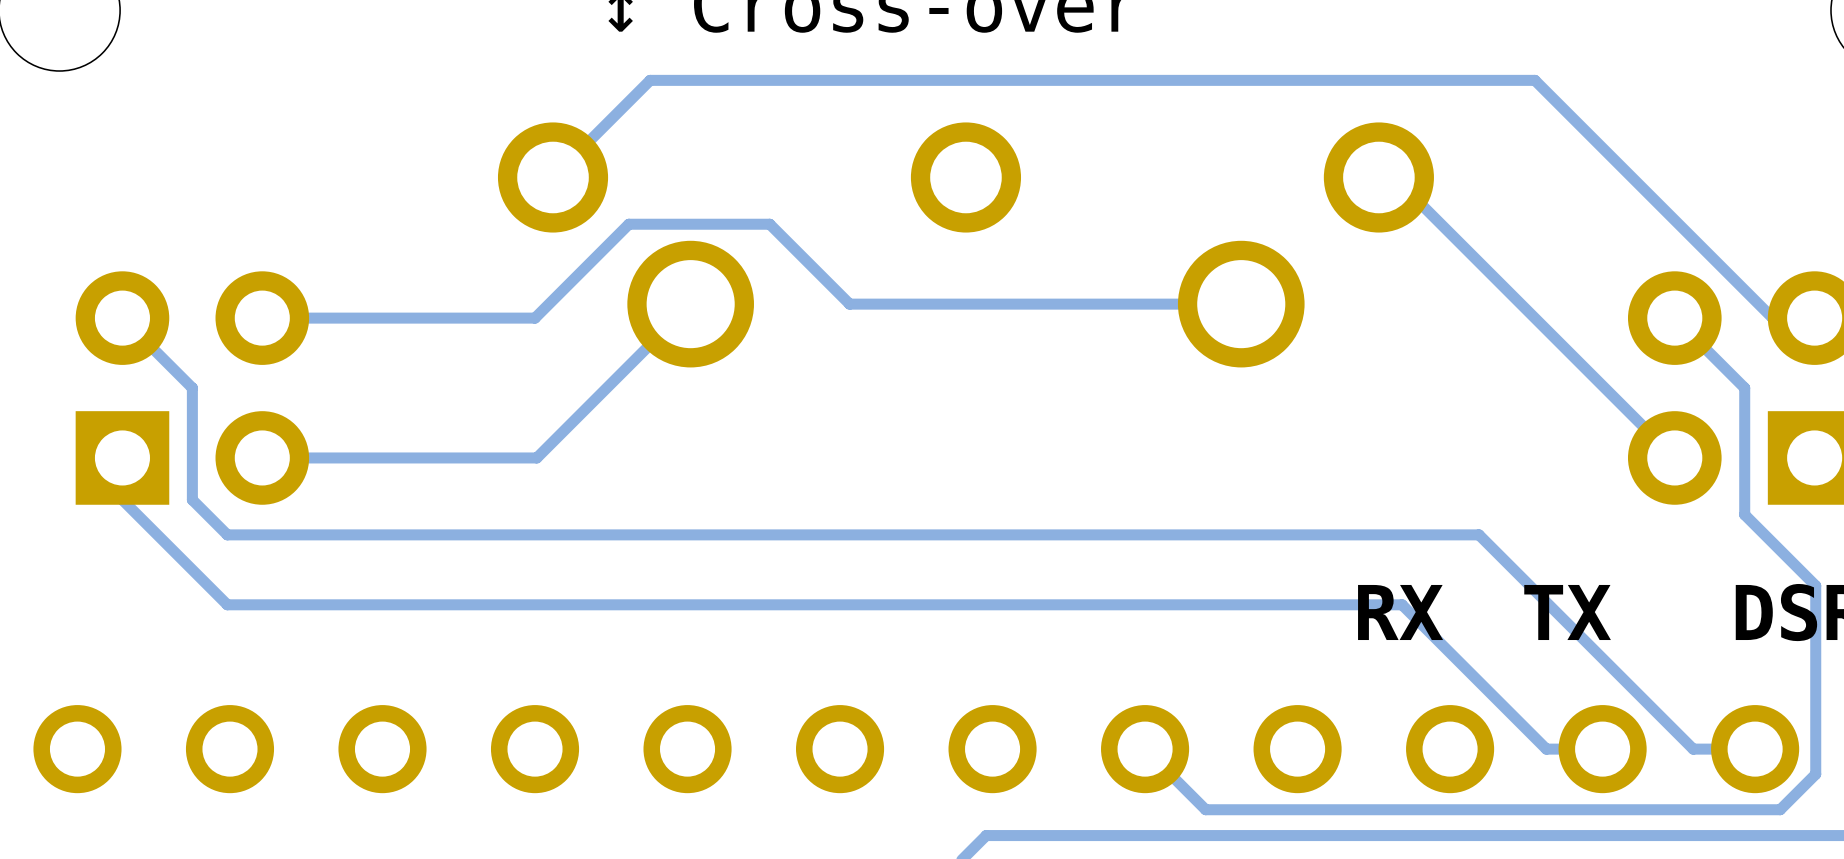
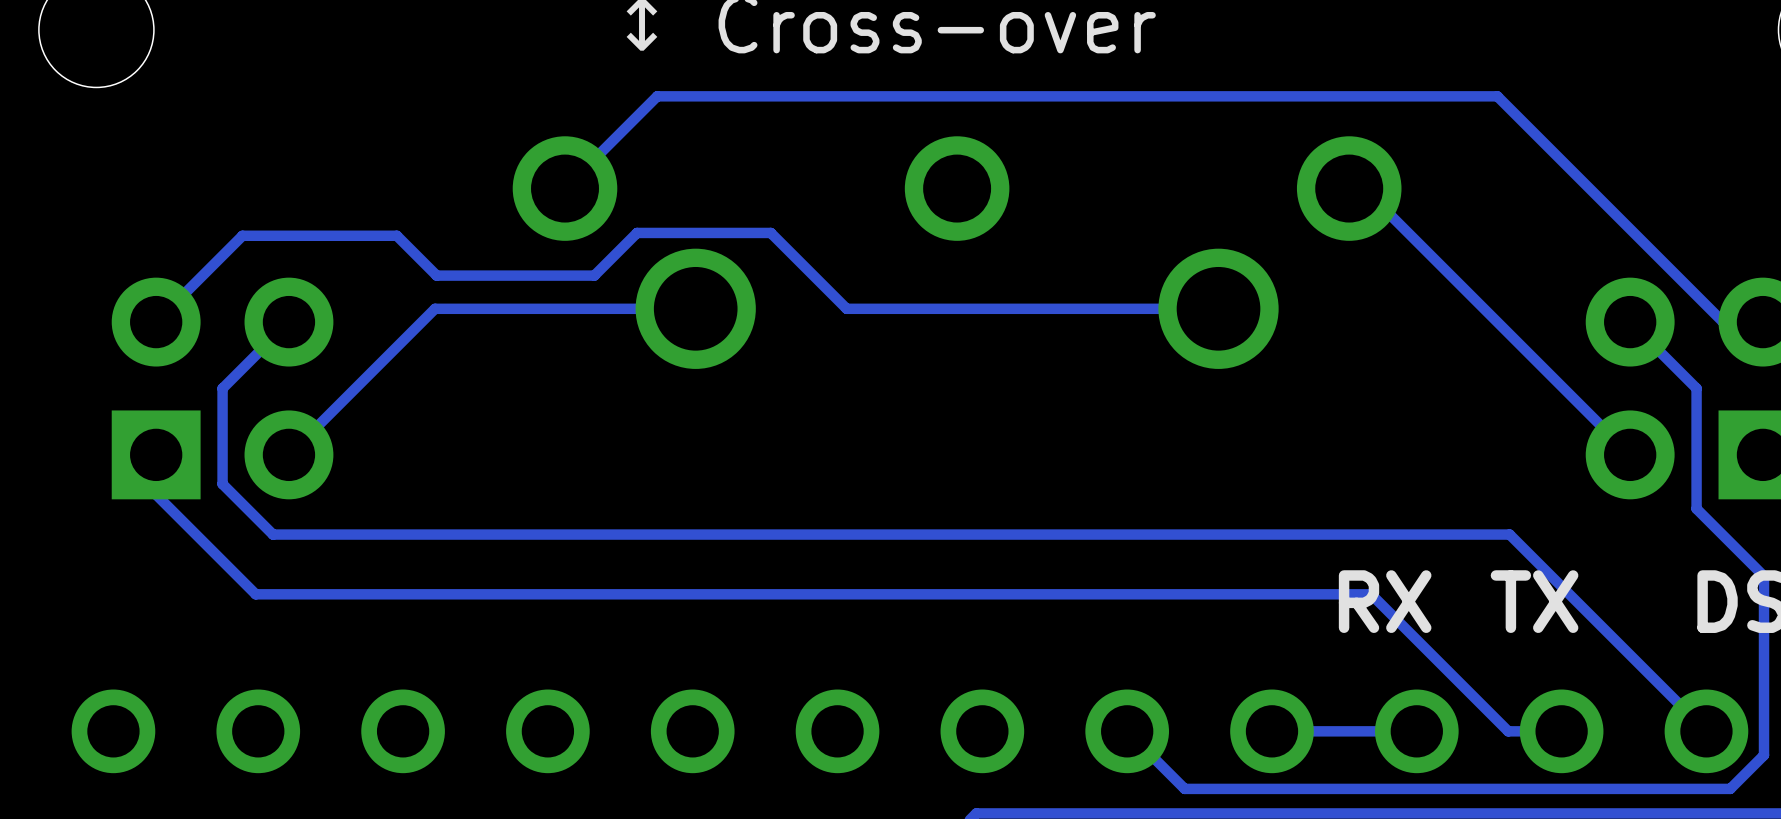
track: (583, 269) (535, 318) (262, 318) -> (594, 275) (436, 275) (396, 235) (242, 235) (156, 322)
track: (690, 304) (536, 457) (262, 457) -> (695, 308) (435, 308) (288, 454)
track: (122, 318) (192, 388) -> (288, 322) (222, 388)
track: (192, 488) (192, 499) (227, 534) (1479, 534) (1693, 749) (1755, 749) -> (222, 484) (273, 534) (1509, 534) (1706, 731)
track: none -> (1416, 731) (1271, 731)

